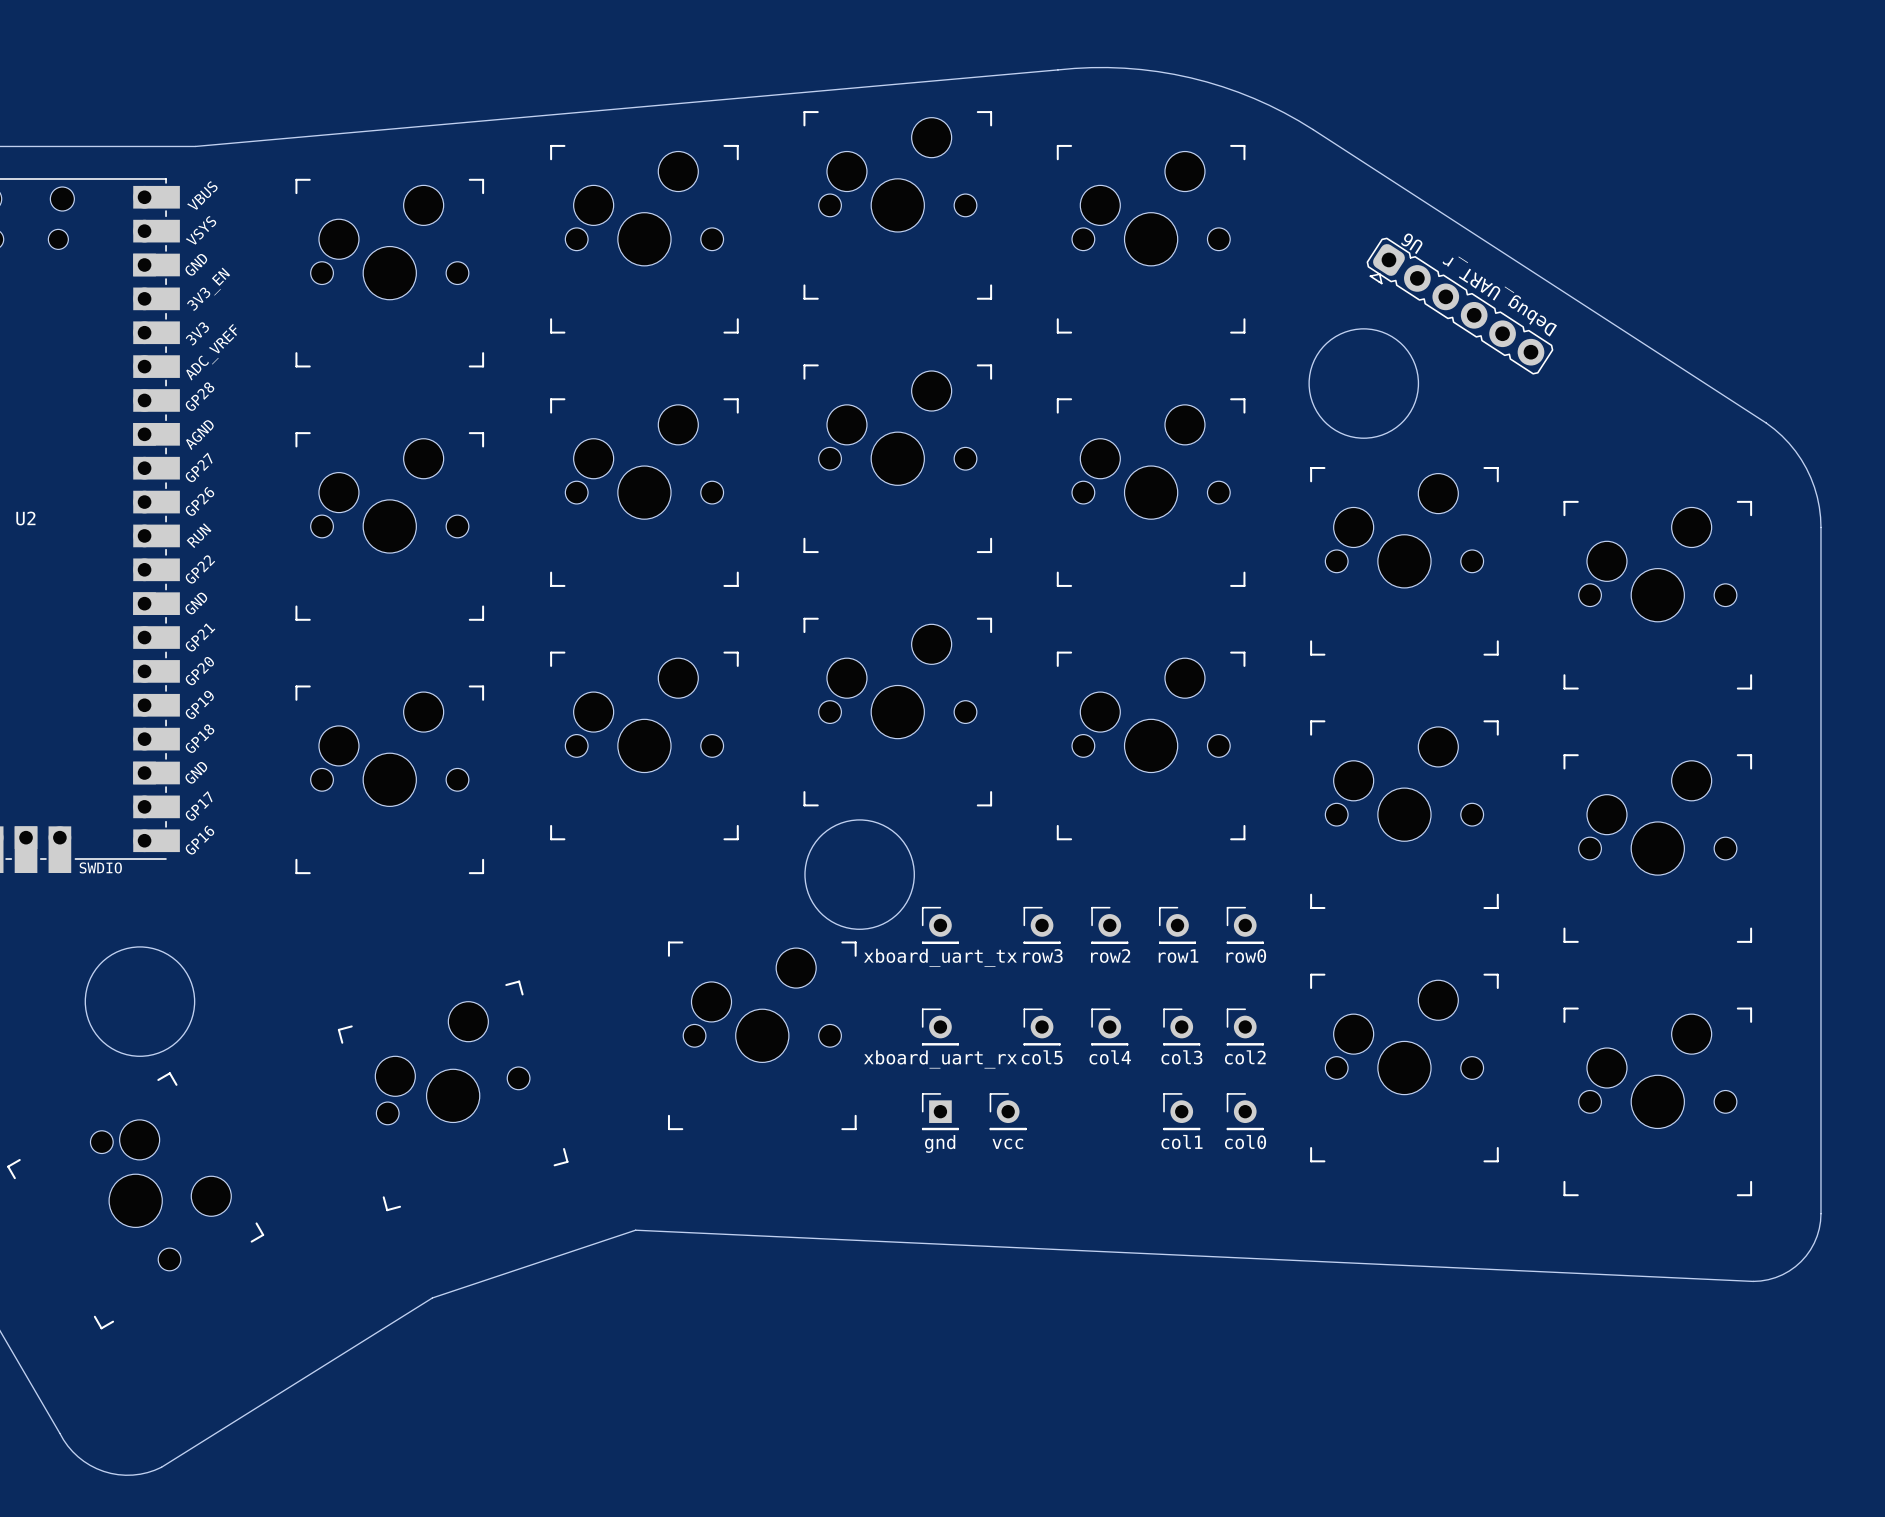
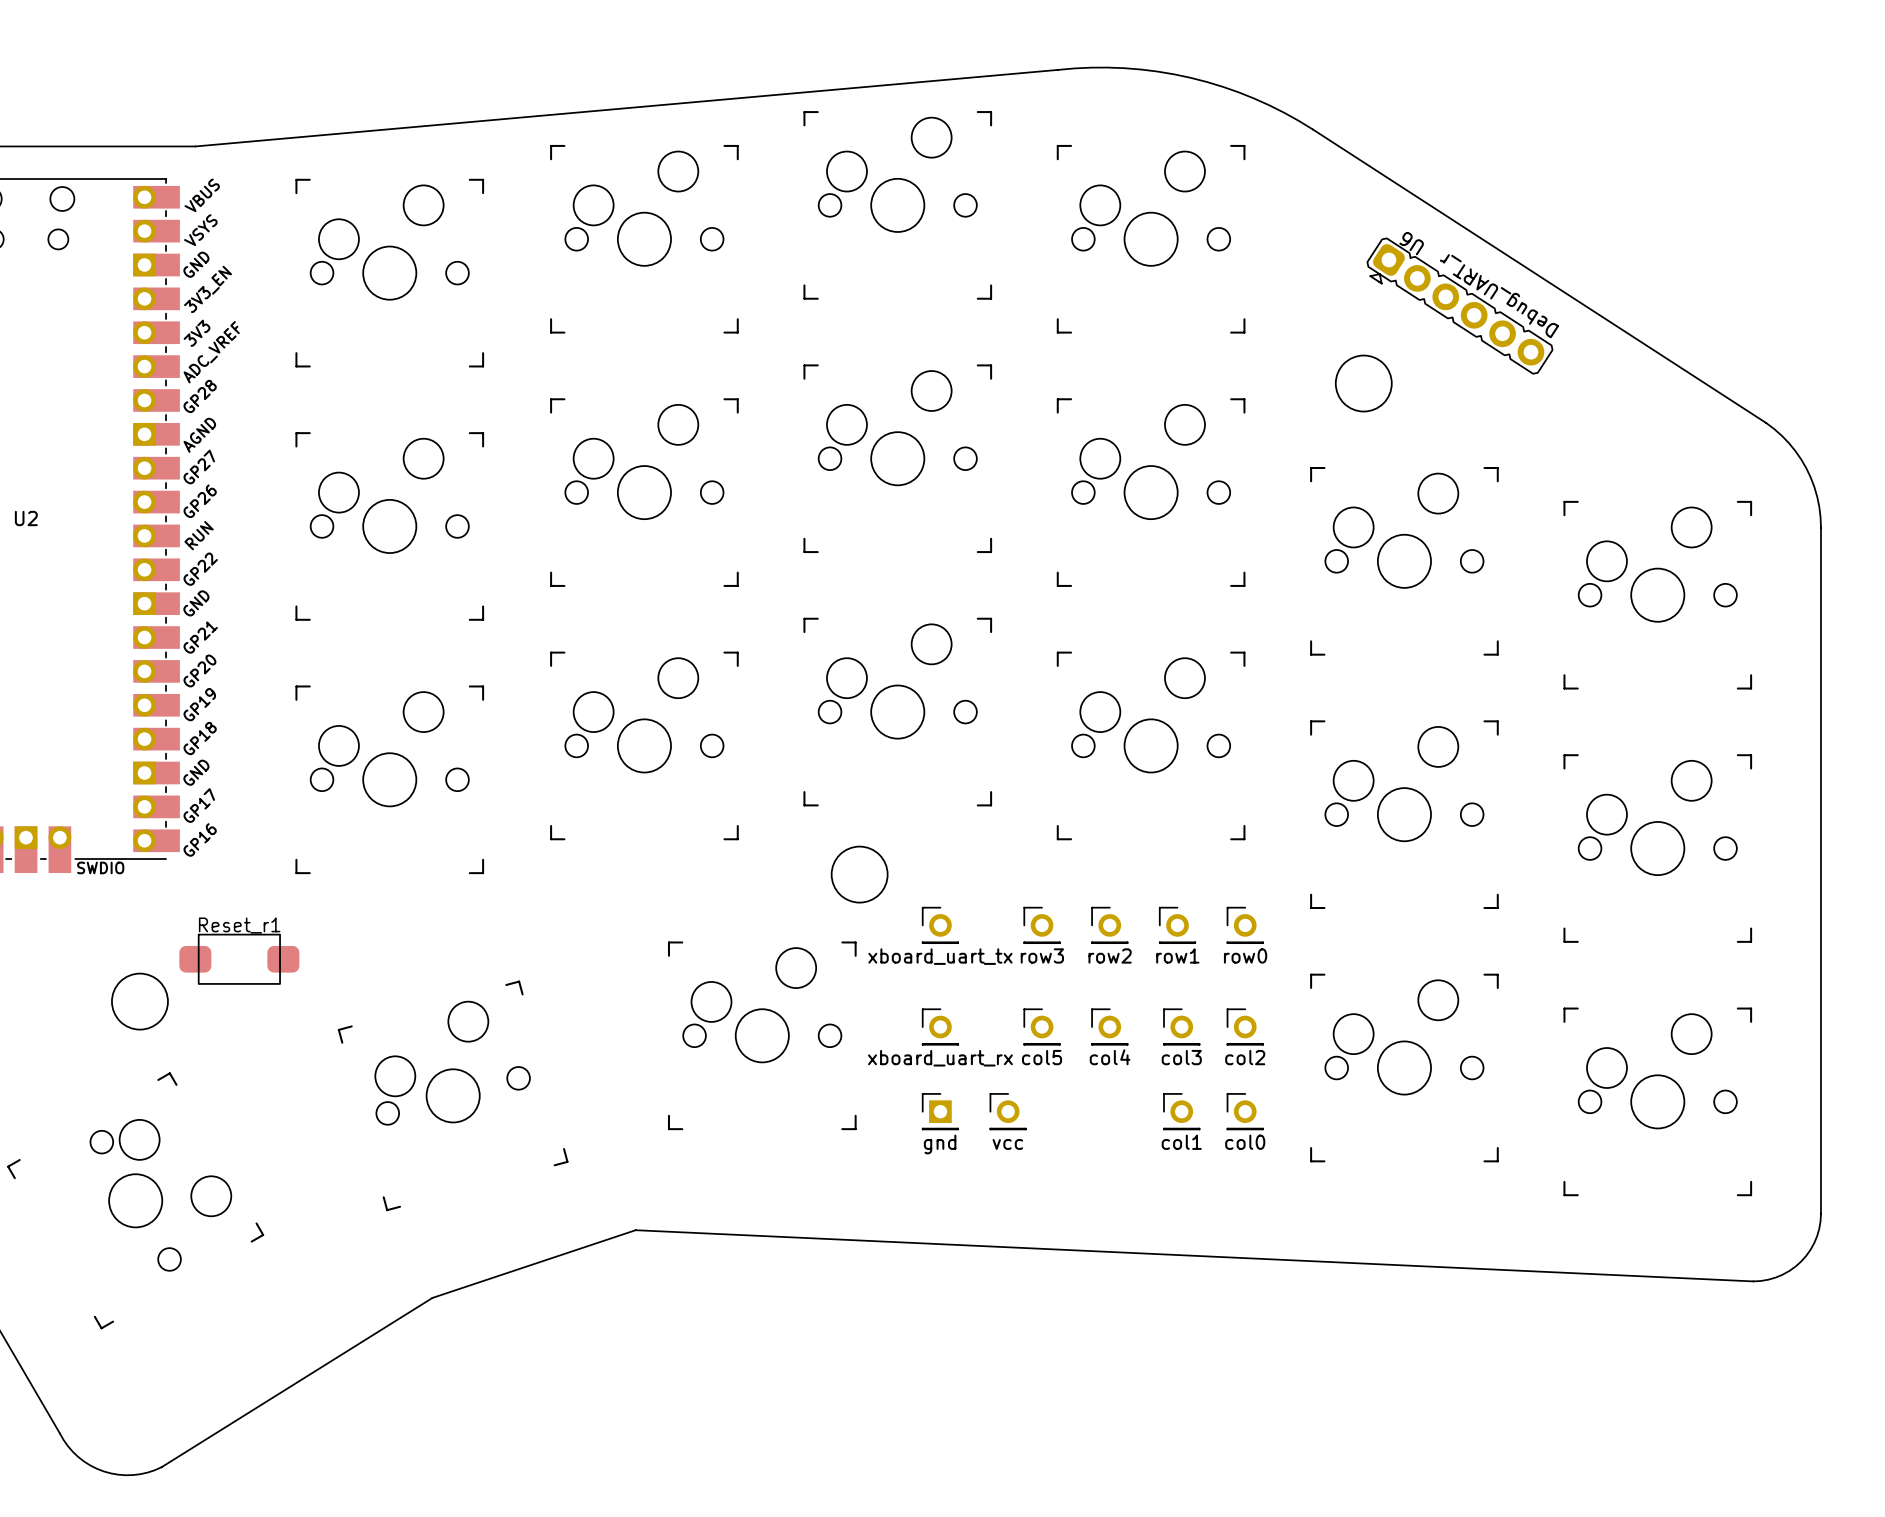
round board edge size: [1308, 328, 1420, 439] -> [1335, 354, 1393, 413]
round board edge size: [804, 819, 915, 930] -> [830, 845, 889, 904]
round board edge size: [84, 946, 196, 1057] -> [111, 972, 169, 1031]
Reset_r1: none -> (239, 959)

